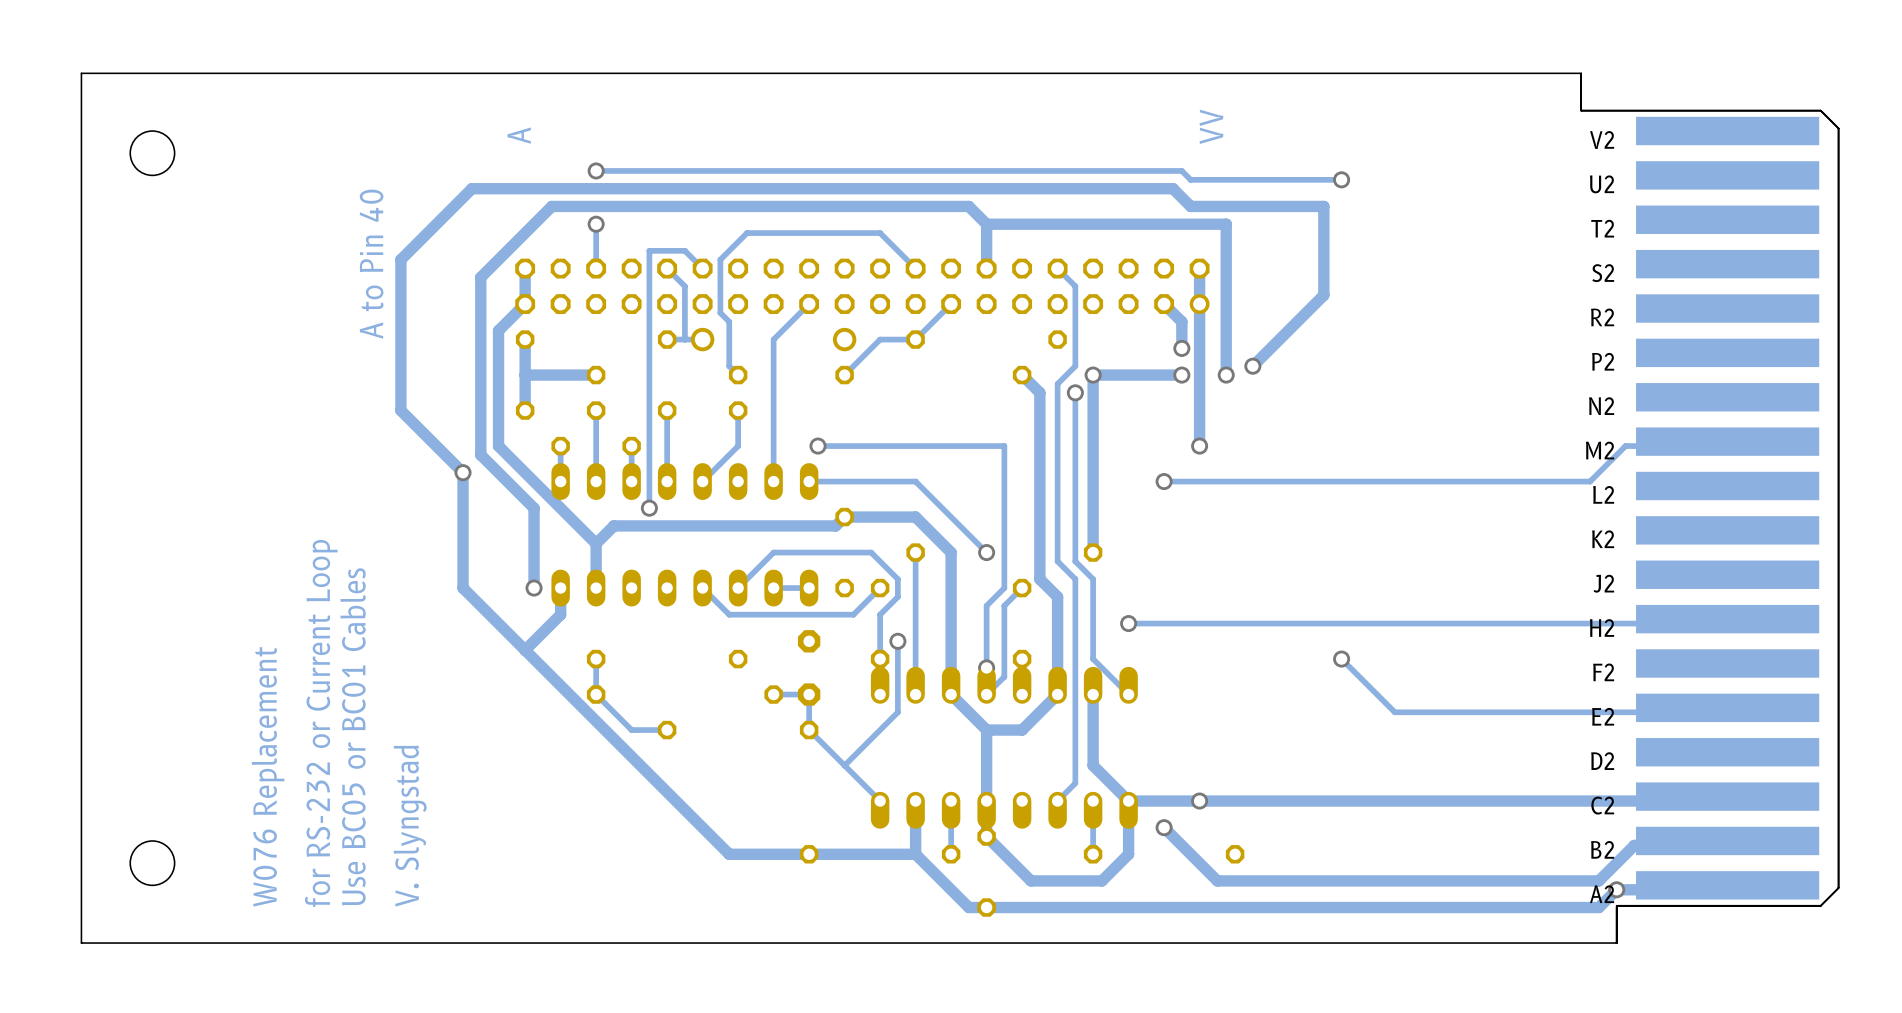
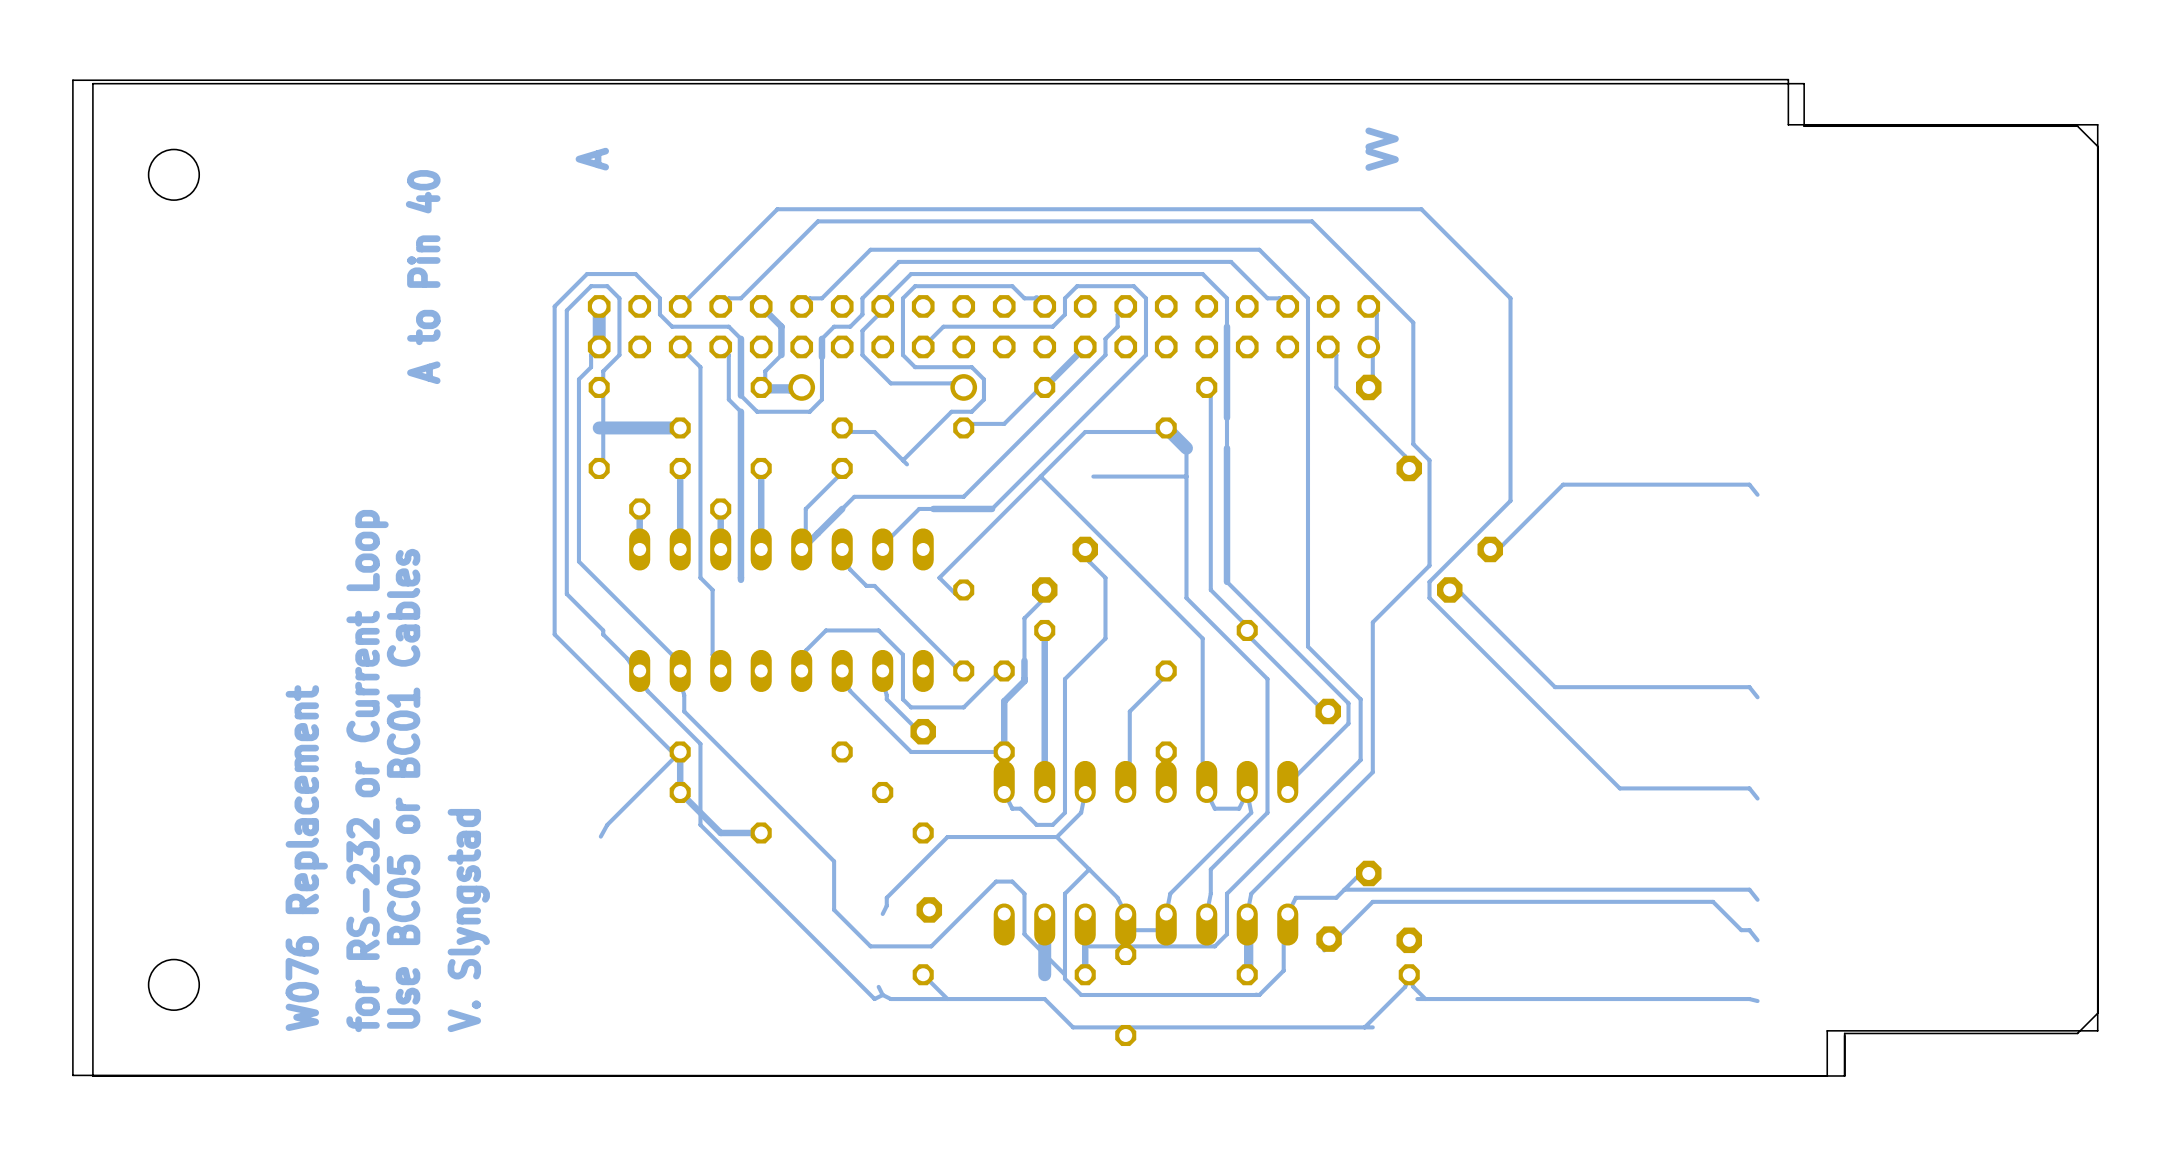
board edge: none -> (1788, 79) (72, 80) (72, 1075) (1827, 1075) (1827, 1030) (2097, 1030) (2097, 124) (1788, 124) (1788, 79)
track: (596, 170) (1181, 170) (1190, 179) (1341, 179) -> none
via: (596, 170) -> none
via: (1341, 179) -> none
track: (596, 224) (596, 268) -> (1510, 298) (1421, 209) (777, 209) (680, 306)
via: (596, 224) -> none
track: (986, 224) (986, 268) -> (842, 508) (854, 496) (963, 496) (1105, 355) (1105, 338) (1117, 326) (1117, 314) (1125, 306)
track: (986, 224) (968, 206) (551, 206) (480, 277) (480, 454) (534, 508) (534, 588) -> none
track: (986, 224) (1226, 224) (1226, 375) -> none
track: (908, 261) (880, 233) (747, 233) (720, 259) (720, 296) -> (1036, 298) (1024, 298) (1012, 286) (915, 286) (902, 298) (902, 355) (915, 367) (971, 367) (983, 379) (983, 399) (971, 411) (951, 411) (902, 460)
track: (1323, 261) (1323, 206) (1190, 206) (1172, 188) (471, 188) (400, 259) (400, 410) (463, 472) (463, 588) (729, 854) (915, 854) (968, 907) (1598, 907) (1616, 889) (1723, 889) (1727, 885) -> none
track width: thick (1323, 261) (1323, 295) -> thin (1510, 298) (1510, 336)
track: none -> (720, 306) (728, 298) (740, 298) (817, 221) (1312, 221) (1413, 322) (1413, 444) (1429, 460) (1429, 565) (1372, 622) (1372, 772) (1251, 893) (1247, 913) (1251, 934) (1251, 966) (1247, 976)
track: (702, 268) (684, 250) (649, 250) (649, 296) -> (600, 836) (607, 824) (680, 751) (672, 751) (554, 634) (554, 306) (587, 274) (635, 274) (659, 298) (659, 314) (672, 326) (728, 326) (740, 338)
track: none -> (801, 306) (809, 298) (821, 298) (870, 249) (1259, 249) (1307, 298) (1307, 646) (1360, 699) (1360, 760) (1226, 893) (1226, 934) (1214, 946) (1089, 946)
track: (1057, 268) (1075, 286) -> (962, 389) (951, 383) (890, 383) (862, 355) (862, 330) (878, 314) (886, 298) (911, 274) (1202, 274) (1226, 298) (1226, 326)
track: none -> (1287, 306) (1279, 298) (1267, 298) (1231, 261) (898, 261) (862, 298) (862, 314) (850, 326) (834, 326) (821, 338)
track: (1199, 268) (1199, 446) -> (1368, 306) (1376, 314) (1376, 338) (1368, 346) (1372, 355) (1372, 375) (1368, 387)
track: (1323, 295) (1252, 366) -> (1510, 336) (1510, 500) (1429, 581) (1429, 598) (1619, 788) (1749, 788) (1757, 798)
track: none -> (680, 346) (700, 367) (700, 577) (712, 589) (712, 654) (718, 675)
track: (809, 304) (773, 339) (773, 481) -> (923, 346) (943, 326) (1052, 326) (1064, 314) (1064, 298) (1077, 286) (1133, 286) (1145, 298) (1145, 355) (992, 508)
track: (518, 311) (498, 330) (498, 446) (596, 543) -> (591, 355) (591, 367) (578, 379) (578, 561) (672, 654) (684, 695) (684, 711) (834, 861) (834, 909) (870, 946) (931, 946) (996, 881) (1012, 881) (1024, 893) (1024, 934) (1064, 974)
track: (684, 311) (684, 339) -> (781, 355) (765, 371) (765, 379) (761, 387) (769, 391) (789, 391) (800, 389)
track: (1171, 311) (1181, 321) (1181, 348) -> (1336, 355) (1336, 387) (1405, 456) (1409, 468)
track: (720, 312) (729, 321) (729, 366) (738, 375) -> (821, 357) (821, 399) (809, 411) (757, 411) (740, 395)
track: (525, 339) (525, 410) -> (882, 994) (874, 999) (700, 824) (700, 743) (647, 691) (627, 658) (603, 634) (603, 630) (566, 594) (566, 310) (591, 286) (607, 286) (619, 298) (619, 355) (603, 371) (603, 379) (599, 387) (603, 395) (603, 460) (599, 468)
track: (915, 339) (880, 339) (844, 375) -> (1044, 387) (1036, 391) (1004, 423) (971, 423) (963, 431)
track: none -> (1206, 387) (1210, 395) (1210, 589) (1243, 622) (1251, 638) (1320, 707) (1328, 711)
part: none -> (1368, 387)
track: (649, 346) (649, 360) -> (720, 346) (728, 355) (728, 399) (740, 411)
via: (1181, 348) -> none
track: (1075, 366) (1057, 383) (1057, 561) (1075, 579) (1075, 783) (1057, 801) -> (1226, 417) (1226, 448)
via: (1252, 366) -> none
track: none -> (842, 427) (850, 432) (874, 432) (907, 464)
via: (1093, 375) -> none
track: (1181, 375) (1093, 375) (1093, 552) -> none
via: (1181, 375) -> none
via: (1226, 375) -> none
track: none -> (1166, 431) (1085, 432) (939, 577) (955, 594) (963, 589) (971, 594)
track width: thick (1039, 392) (1039, 524) -> thin (1186, 448) (1186, 598)
via: (1075, 392) -> none
track: (738, 410) (738, 446) -> (842, 468) (838, 476) (805, 508) (805, 533) (799, 553)
part: none -> (1409, 468)
track: none -> (1040, 476) (1202, 638) (1202, 772) (1206, 792) (1214, 808) (1239, 808) (1247, 792) (1251, 812) (1170, 893) (1166, 913) (1158, 930) (1133, 930) (1117, 897) (1056, 837)
track: none -> (1186, 476) (1093, 476)
track: none -> (1757, 494) (1749, 484) (1563, 484) (1502, 545) (1490, 549)
track: (1727, 441) (1723, 446) (1625, 446) (1590, 481) (1164, 481) -> none
track: none -> (933, 508) (919, 508) (890, 537) (880, 553)
via: (818, 446) -> none
track: (869, 446) (1004, 446) (1004, 588) (986, 605) (986, 667) -> none
via: (1199, 446) -> none
via: (463, 472) -> none
track: (809, 481) (915, 481) (986, 552) -> none
track: none -> (1085, 549) (1089, 561) (1105, 577) (1105, 638) (1064, 679) (1064, 812) (1052, 824) (1036, 824) (1020, 808) (1012, 808) (1004, 792)
part: none -> (1085, 549)
via: (1164, 481) -> none
part: none -> (1490, 549)
track: none -> (840, 553) (850, 569) (866, 585) (874, 585) (955, 666) (963, 670)
via: (649, 508) -> none
track: (1075, 509) (1075, 561) (1093, 579) (1093, 659) (1128, 694) -> (1226, 581) (1348, 703) (1348, 723) (1295, 776) (1287, 792)
part: (1709, 509) -> none
part: none -> (1044, 589)
track: none -> (1449, 589) (1461, 594) (1555, 687) (1749, 687) (1757, 697)
part: none -> (1449, 589)
track: (1039, 524) (1039, 579) (1057, 596) (1057, 694) (1022, 730) (986, 730) -> (1186, 598) (1267, 679) (1267, 812) (1210, 869) (1210, 893) (1206, 913)
track: (596, 543) (613, 525) (835, 525) (844, 517) (915, 517) (951, 552) (951, 694) (986, 730) -> none
track: (596, 543) (596, 588) -> none
via: (986, 552) -> none
track: (897, 579) (871, 552) (773, 552) (738, 588) -> (1024, 660) (1024, 618) (1040, 602) (1044, 589)
via: (534, 588) -> none
track: (560, 588) (560, 614) (525, 650) -> none
track: (809, 588) (773, 588) -> none
track: (880, 588) (853, 614) (729, 614) (702, 588) -> (1004, 670) (996, 675) (963, 707) (911, 707) (902, 699) (902, 654) (878, 630) (826, 630) (805, 650) (799, 675)
track: (1022, 588) (1004, 605) (1004, 676) (986, 694) -> (1166, 670) (1162, 679) (1129, 711) (1129, 772) (1125, 792)
track: none -> (840, 675) (850, 691) (911, 751) (1004, 751) (996, 747)
track: none -> (880, 675) (886, 699) (915, 727) (923, 731)
track: (1727, 619) (1723, 623) (1128, 623) -> none
via: (1128, 623) -> none
part: none -> (1328, 711)
track: (897, 641) (897, 712) (844, 765) -> none
via: (897, 641) -> none
track: (1341, 659) (1394, 712) (1723, 712) (1727, 707) -> none
via: (1341, 659) -> none
via: (986, 667) -> none
track: (773, 694) (809, 694) (809, 730) (880, 801) -> none
part position: (809, 694) -> (929, 909)
track: none -> (1085, 792) (1081, 812) (1056, 837)
track: (1093, 694) (1093, 765) (1128, 801) -> none
track: (986, 730) (986, 836) (1030, 880) (1101, 880) (1128, 854) (1128, 801) -> none
track: none -> (1056, 837) (947, 837) (886, 897) (886, 905) (882, 913)
track: none -> (1089, 869) (1064, 893) (1064, 978) (1081, 994) (1259, 994) (1283, 970) (1283, 934) (1287, 913) (1295, 897) (1336, 897) (1356, 877) (1368, 873)
part: none -> (1368, 873)
track: none -> (1344, 889) (1749, 889) (1757, 899)
track: (1727, 796) (1723, 801) (1128, 801) -> none
via: (1199, 801) -> none
track: none -> (1329, 939) (1340, 934) (1372, 901) (1713, 901) (1741, 930) (1749, 930) (1757, 940)
part: none -> (1329, 939)
part: none -> (1409, 940)
track: (1164, 827) (1217, 880) (1598, 880) (1634, 845) (1723, 845) (1727, 840) -> none
via: (1164, 827) -> none
track: none -> (923, 970) (927, 978) (947, 999)
track: none -> (878, 986) (882, 994)
track: none -> (882, 994) (890, 999) (1044, 999) (1073, 1027) (1372, 1027)
track: none -> (1417, 999) (1749, 999) (1757, 1001)
track: none -> (1425, 999) (1413, 986) (1409, 976) (1405, 986) (1364, 1027)
via: (1616, 889) -> none

